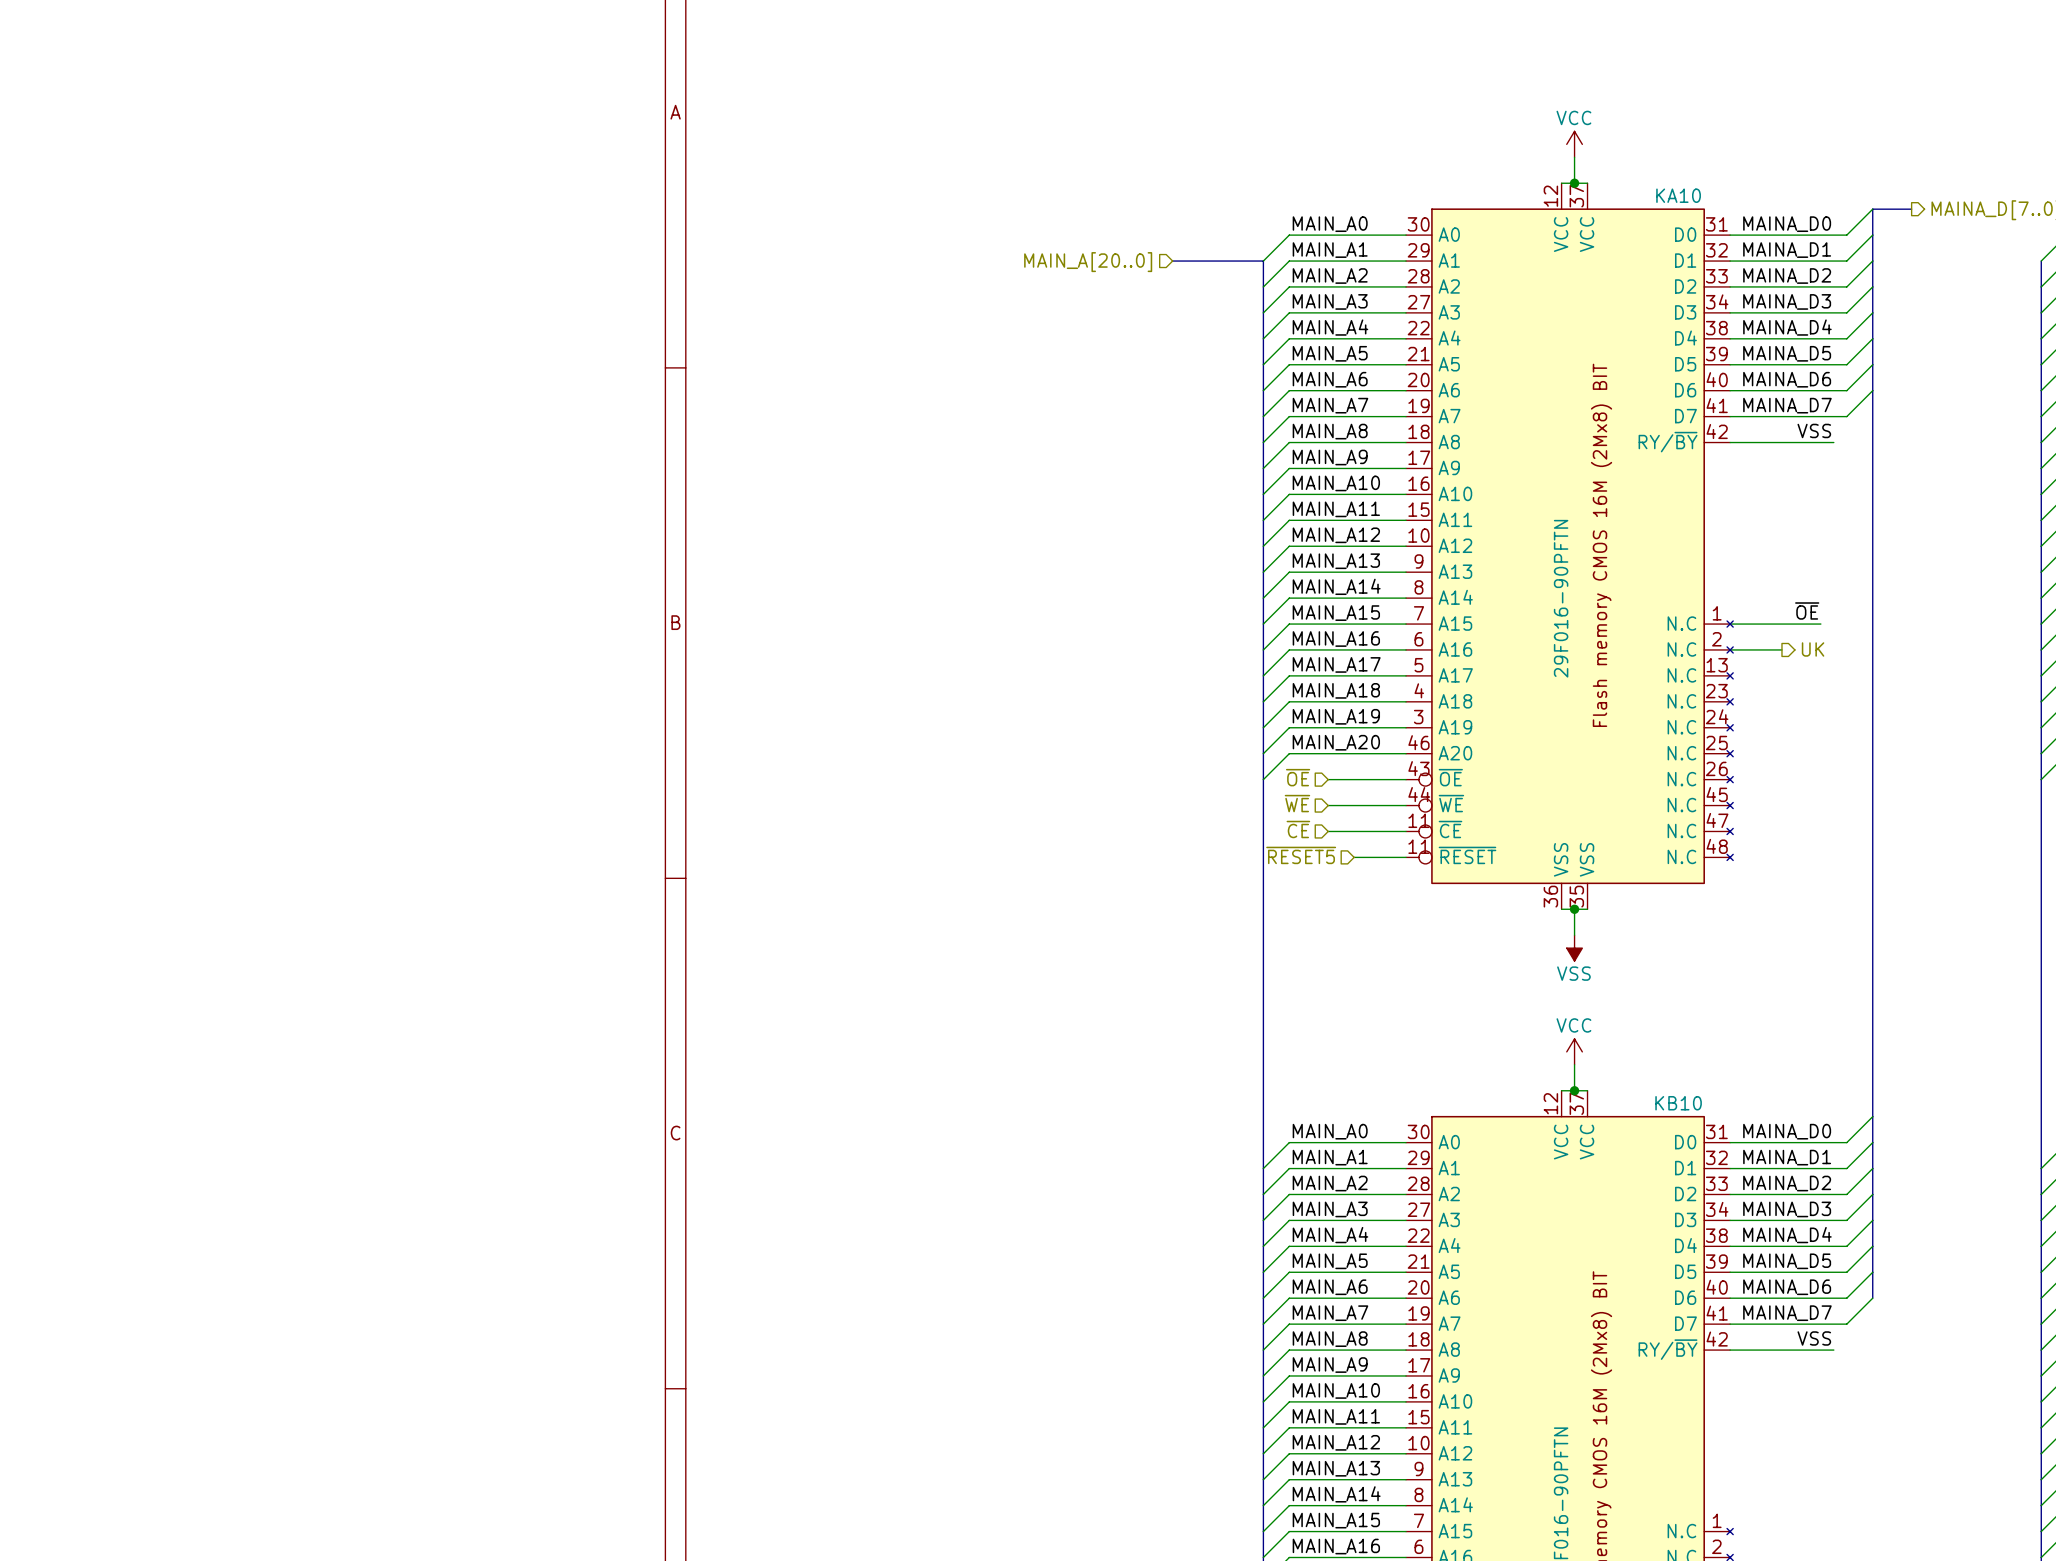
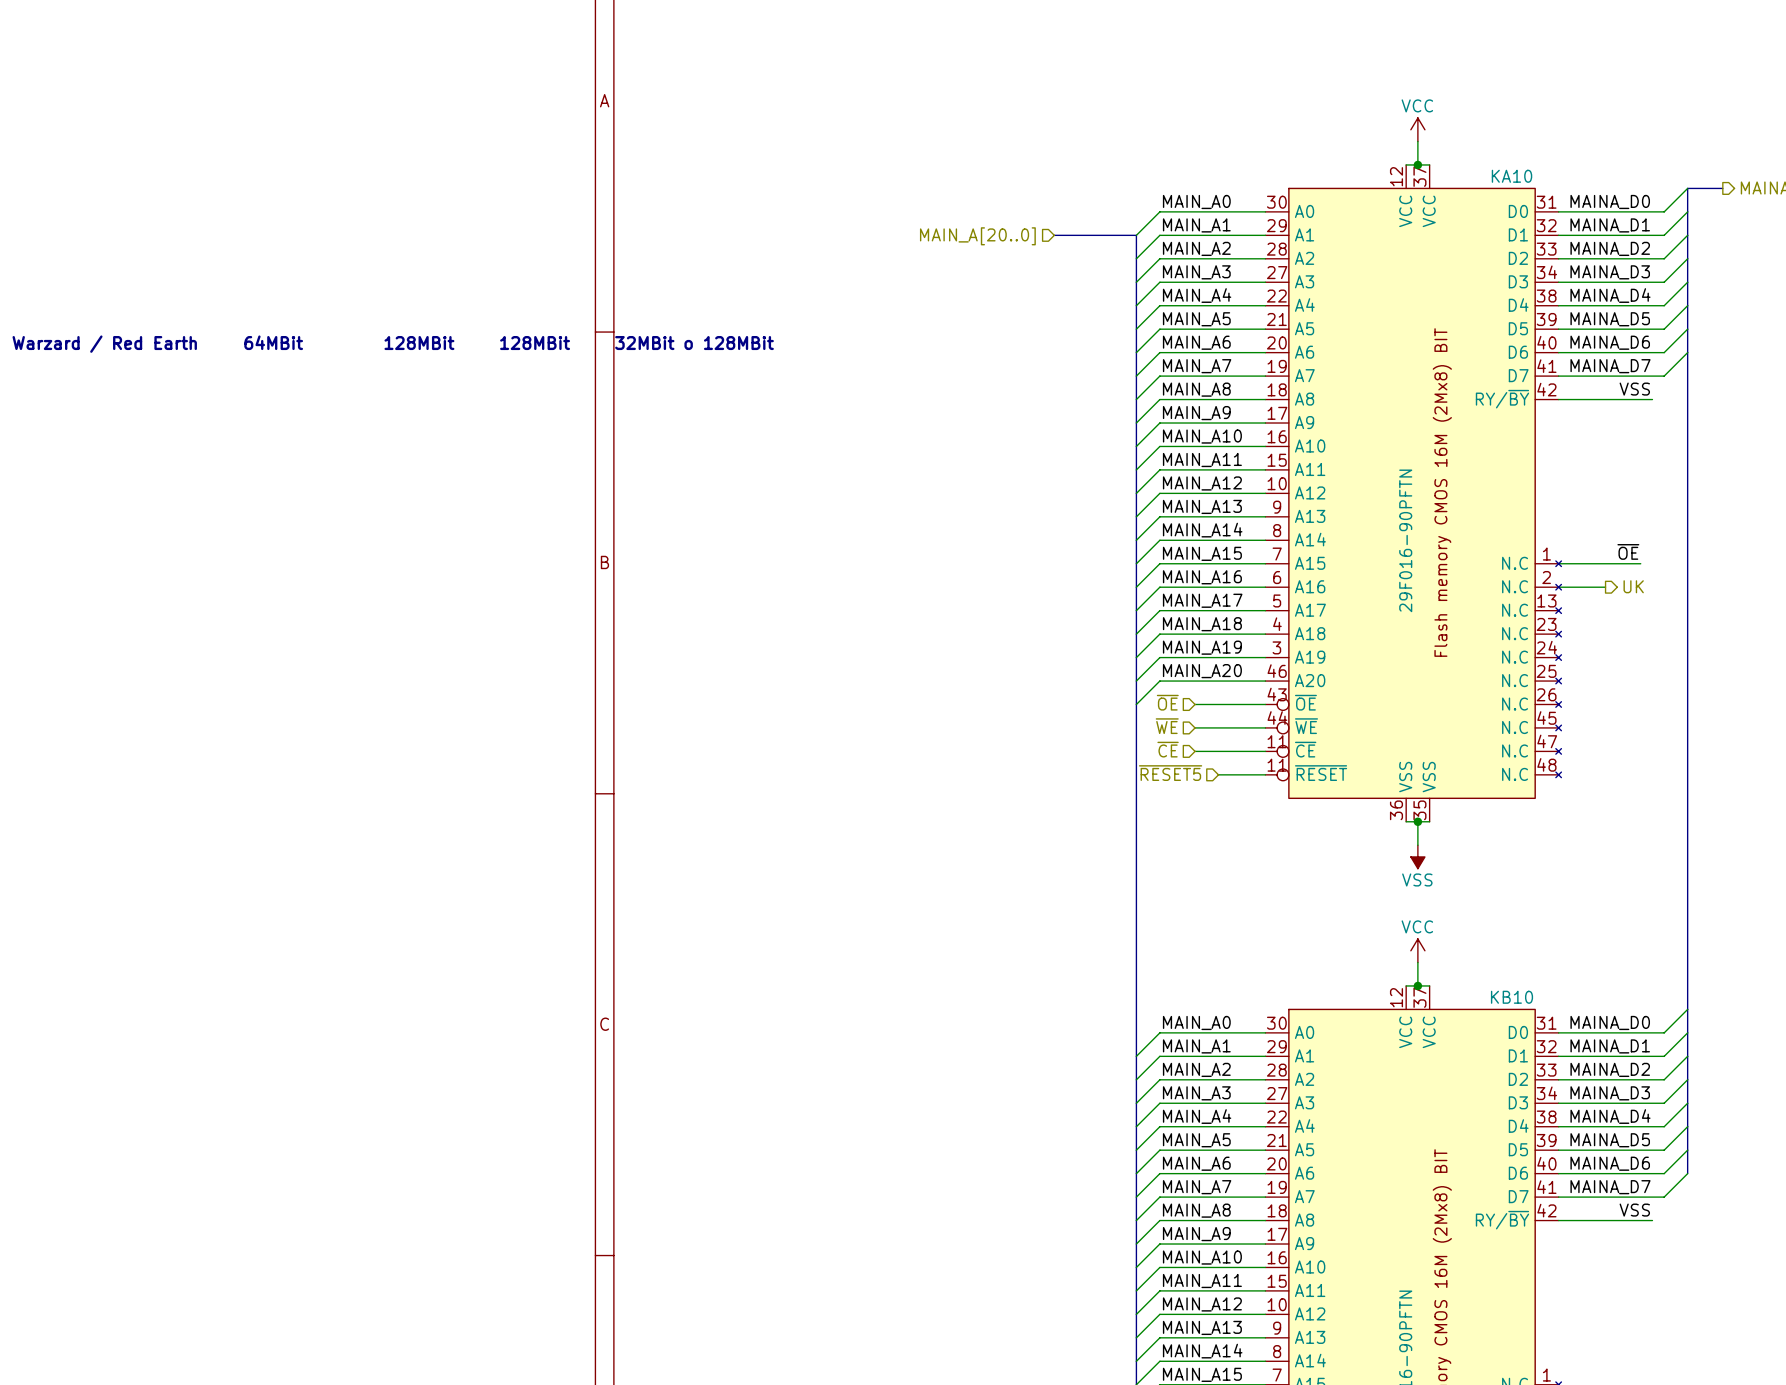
text: none -> Warzard / Red Earth 64MBit 128MBit 128MBit 32MBit o 128MBit (393, 344)

